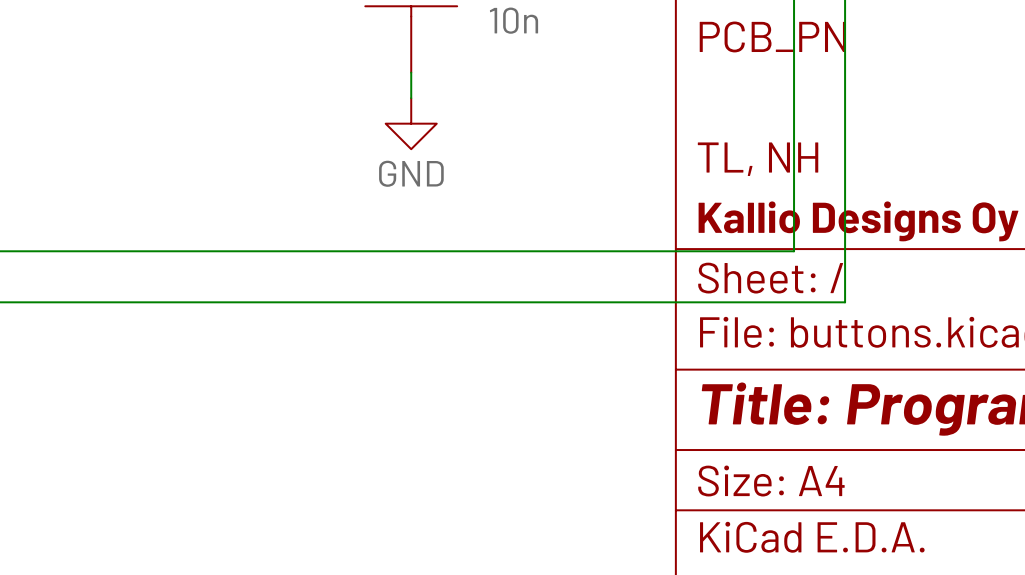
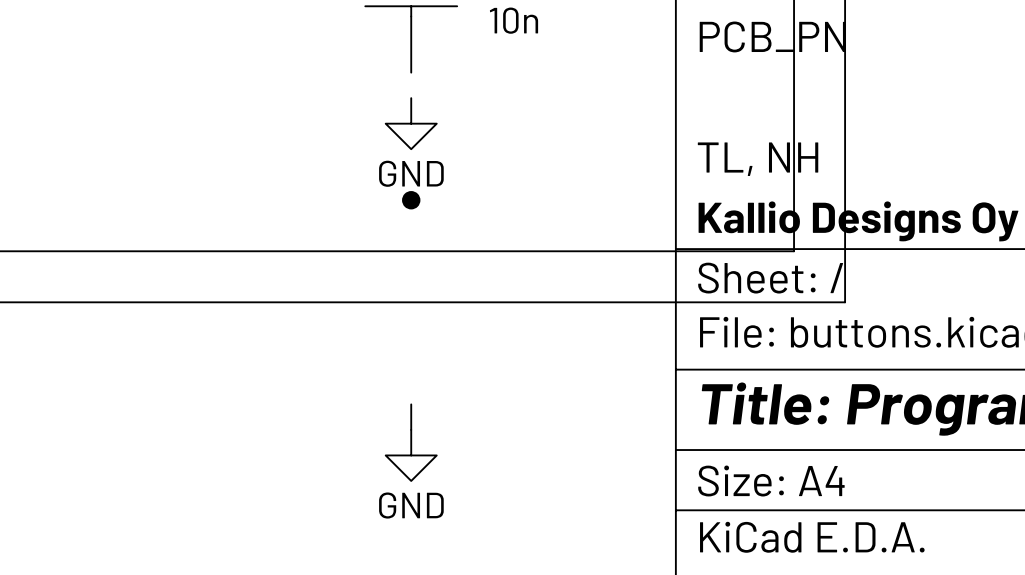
wire: (411, 72) (411, 98) -> (411, 404) (411, 429)
junction: none -> (411, 200)
power symbol: none -> GND (411, 455)

